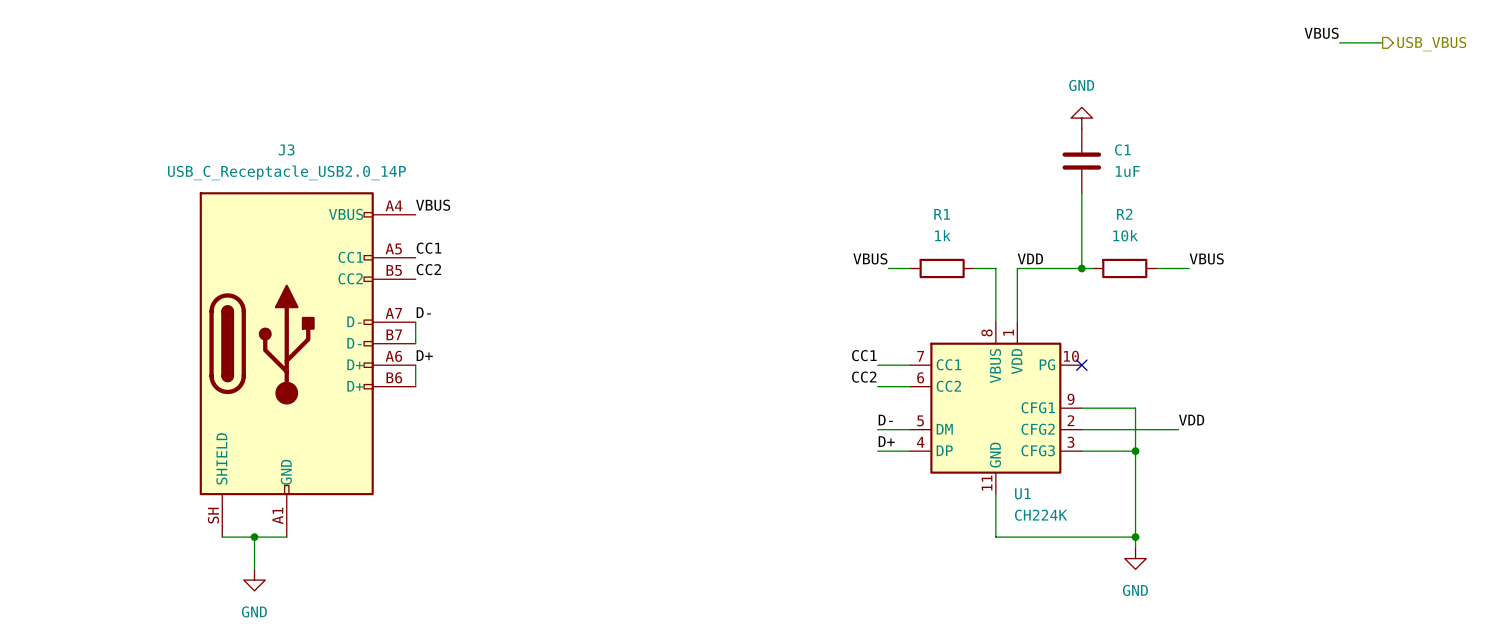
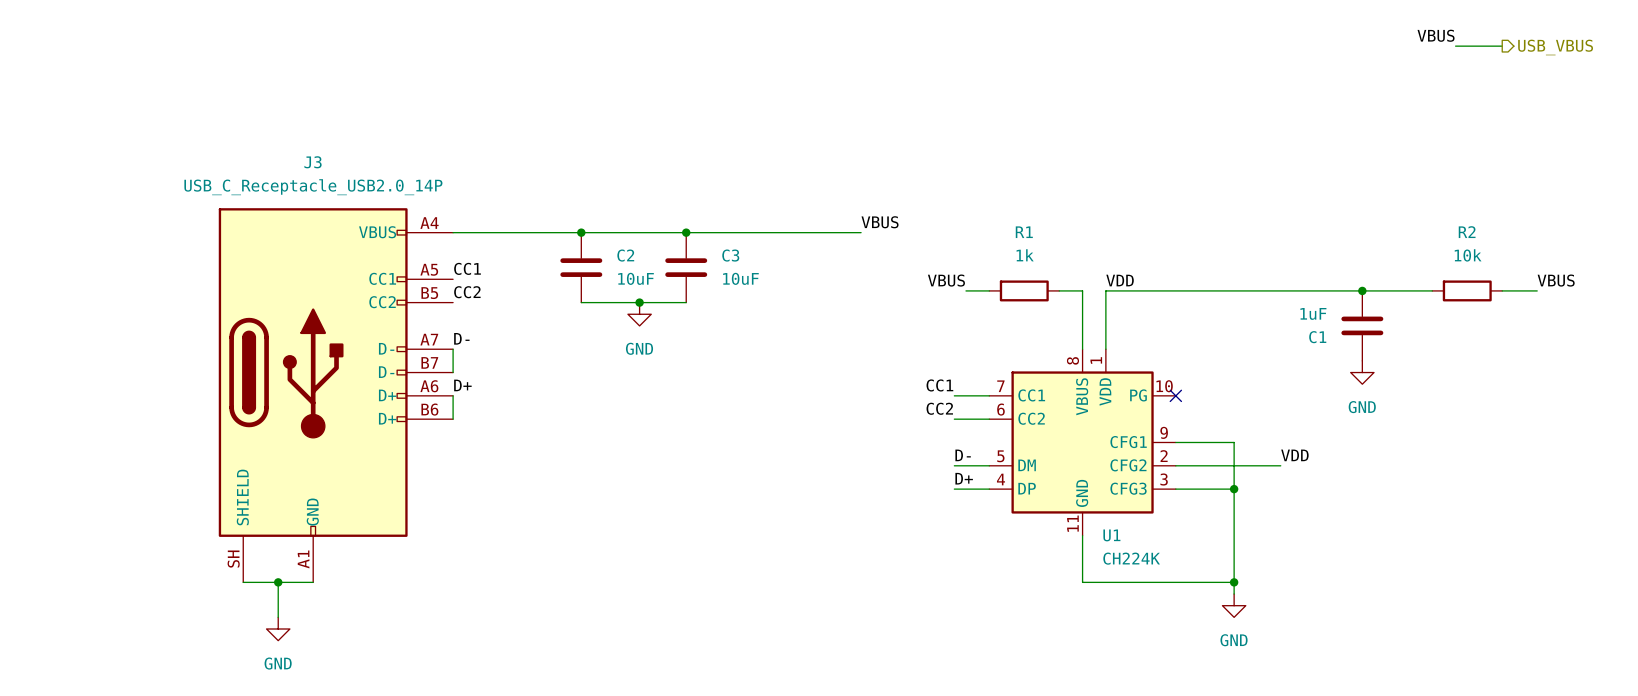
power symbol: GND (1081, 118) -> none
C1 name position: C1 (1122, 149) -> C1 (1317, 337)
C1 position: (1081, 161) -> (1362, 325)
C1 value position: 1uF (1127, 171) -> 1uF (1313, 313)
wire: (1081, 193) (1081, 268) -> none
label: VBUS (433, 205) -> none
label: none -> VBUS (880, 222)
wire: none -> (453, 232) (861, 232)
junction: none -> (581, 232)
junction: none -> (686, 232)
C2: none -> 10uF (581, 267)
C3: none -> 10uF (686, 267)
label: VBUS (1206, 258) -> none
label: none -> VBUS (1556, 280)
junction: (1081, 268) -> none
wire: none -> (1187, 290) (1257, 290)
R2 position: (1124, 268) -> (1467, 290)
wire: none -> (1292, 290) (1432, 290)
junction: none -> (1362, 290)
wire: none -> (1502, 290) (1537, 290)
wire: none -> (581, 302) (686, 302)
junction: none -> (639, 302)
power symbol: none -> GND (639, 314)
power symbol: none -> GND (1362, 372)

